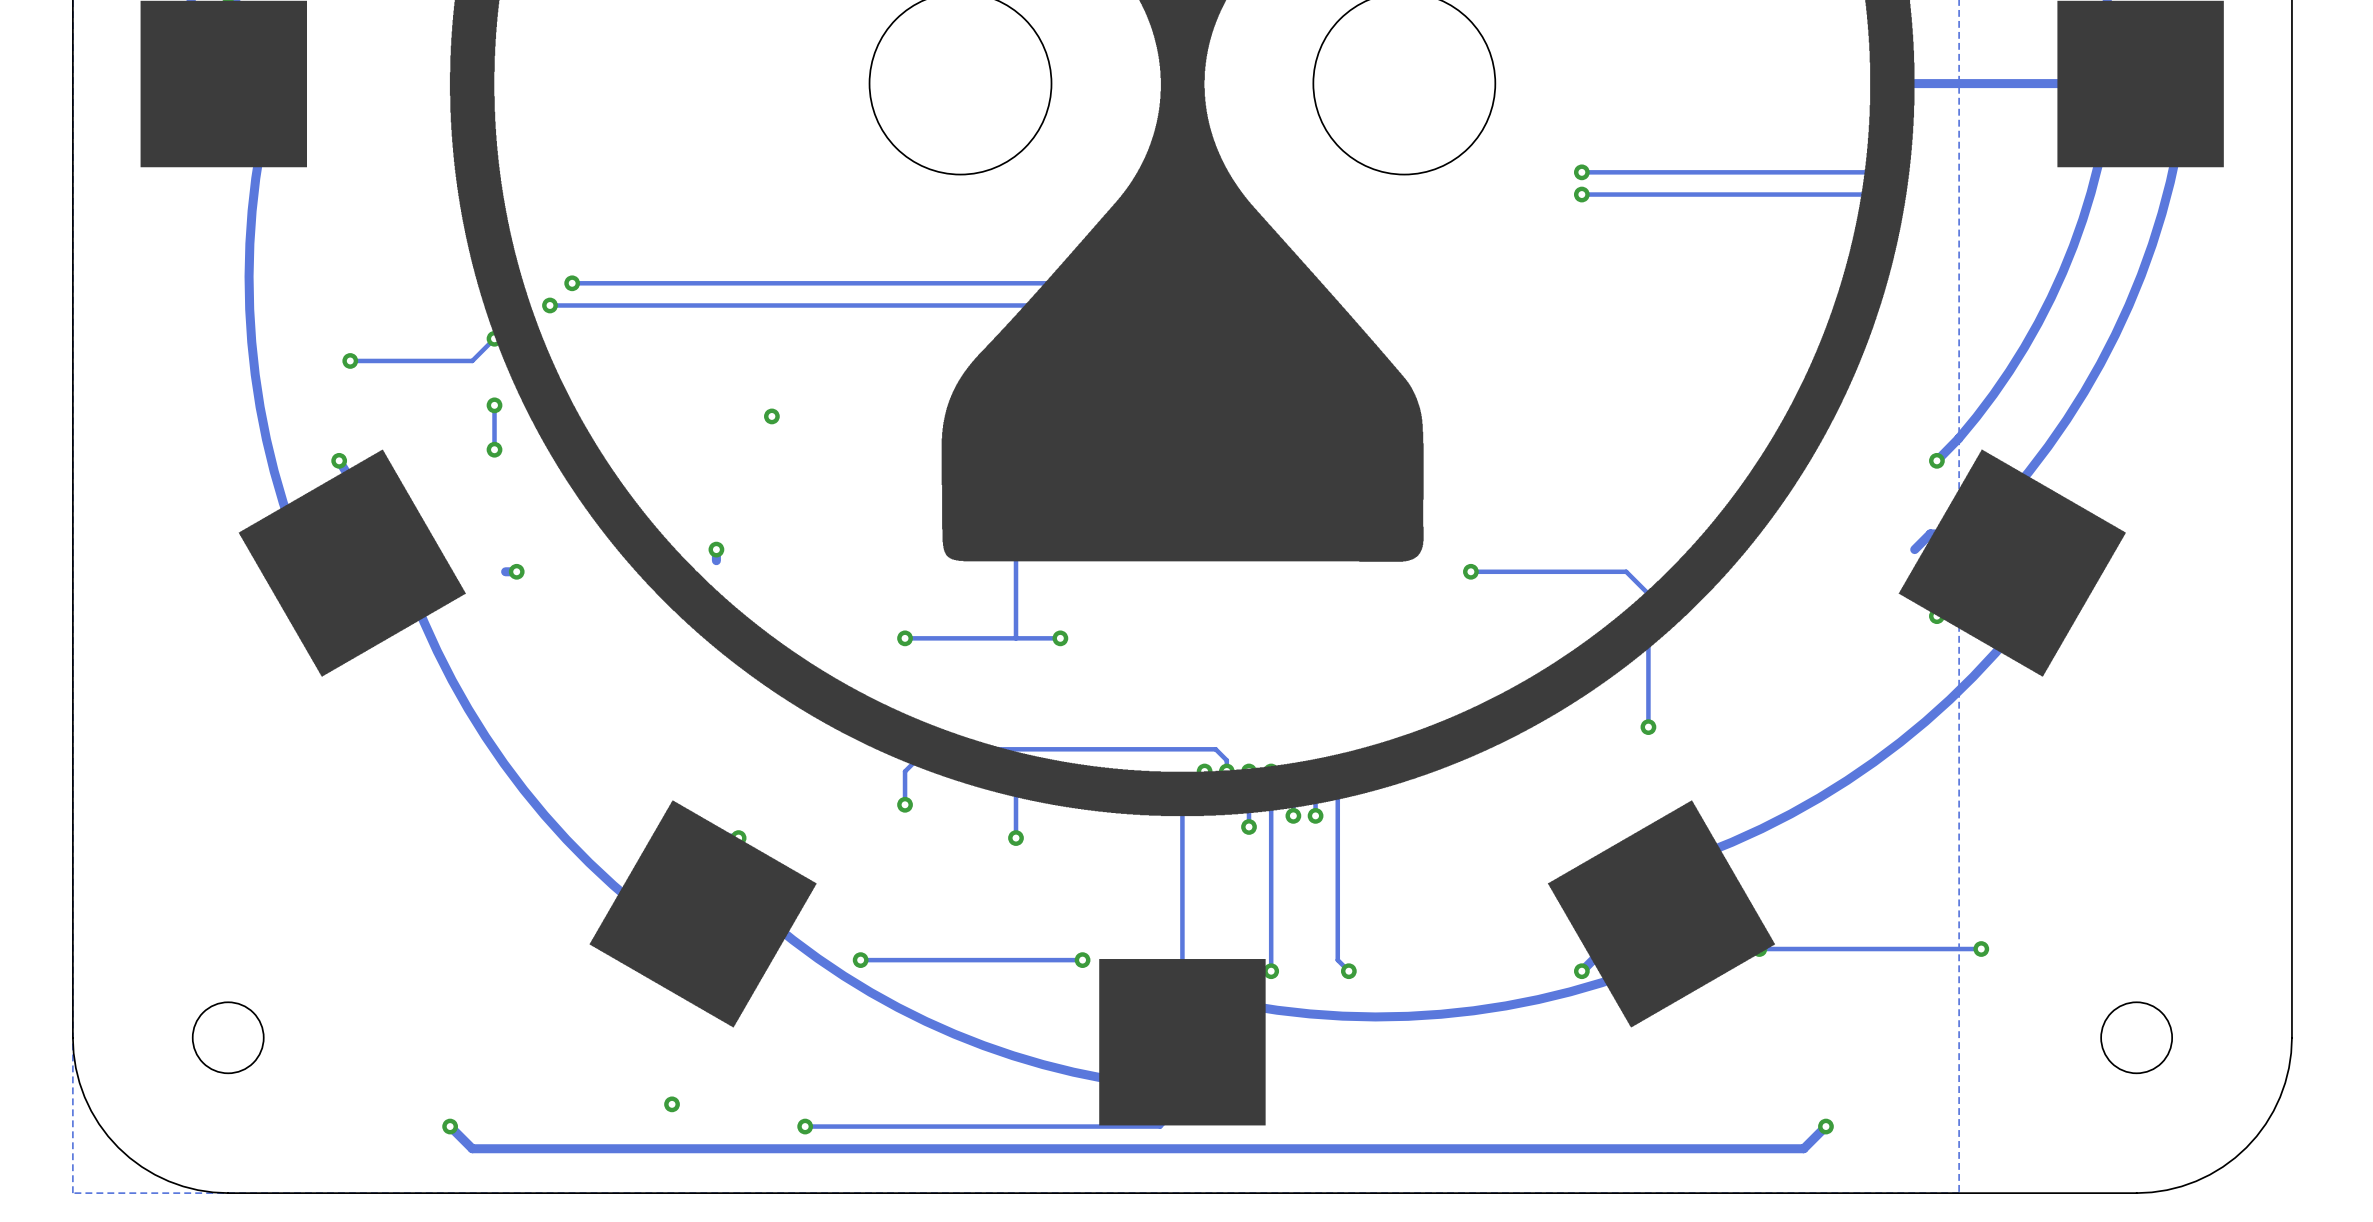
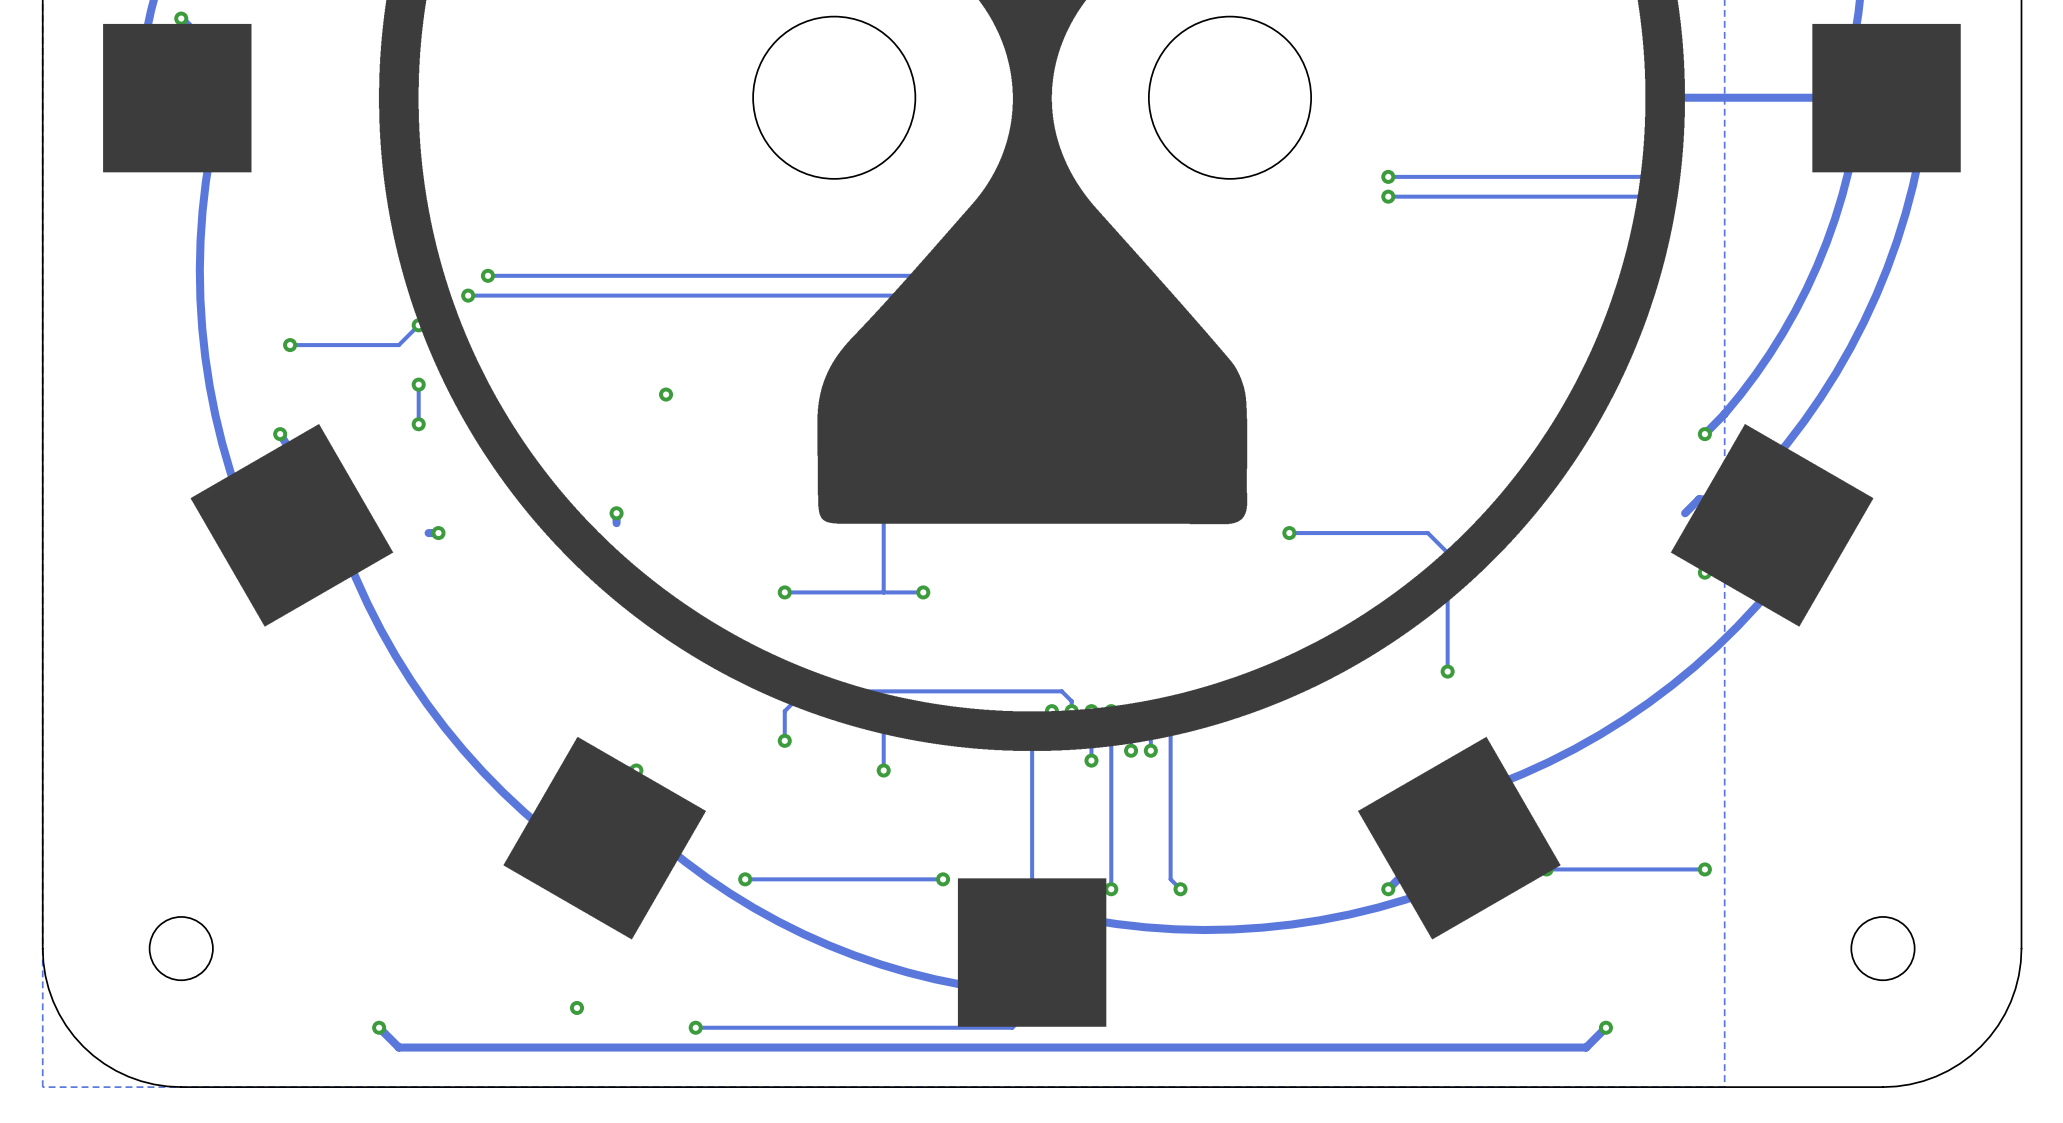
track: (1981, 949) (1936, 949) -> none
via position: (1981, 949) -> (1704, 869)

